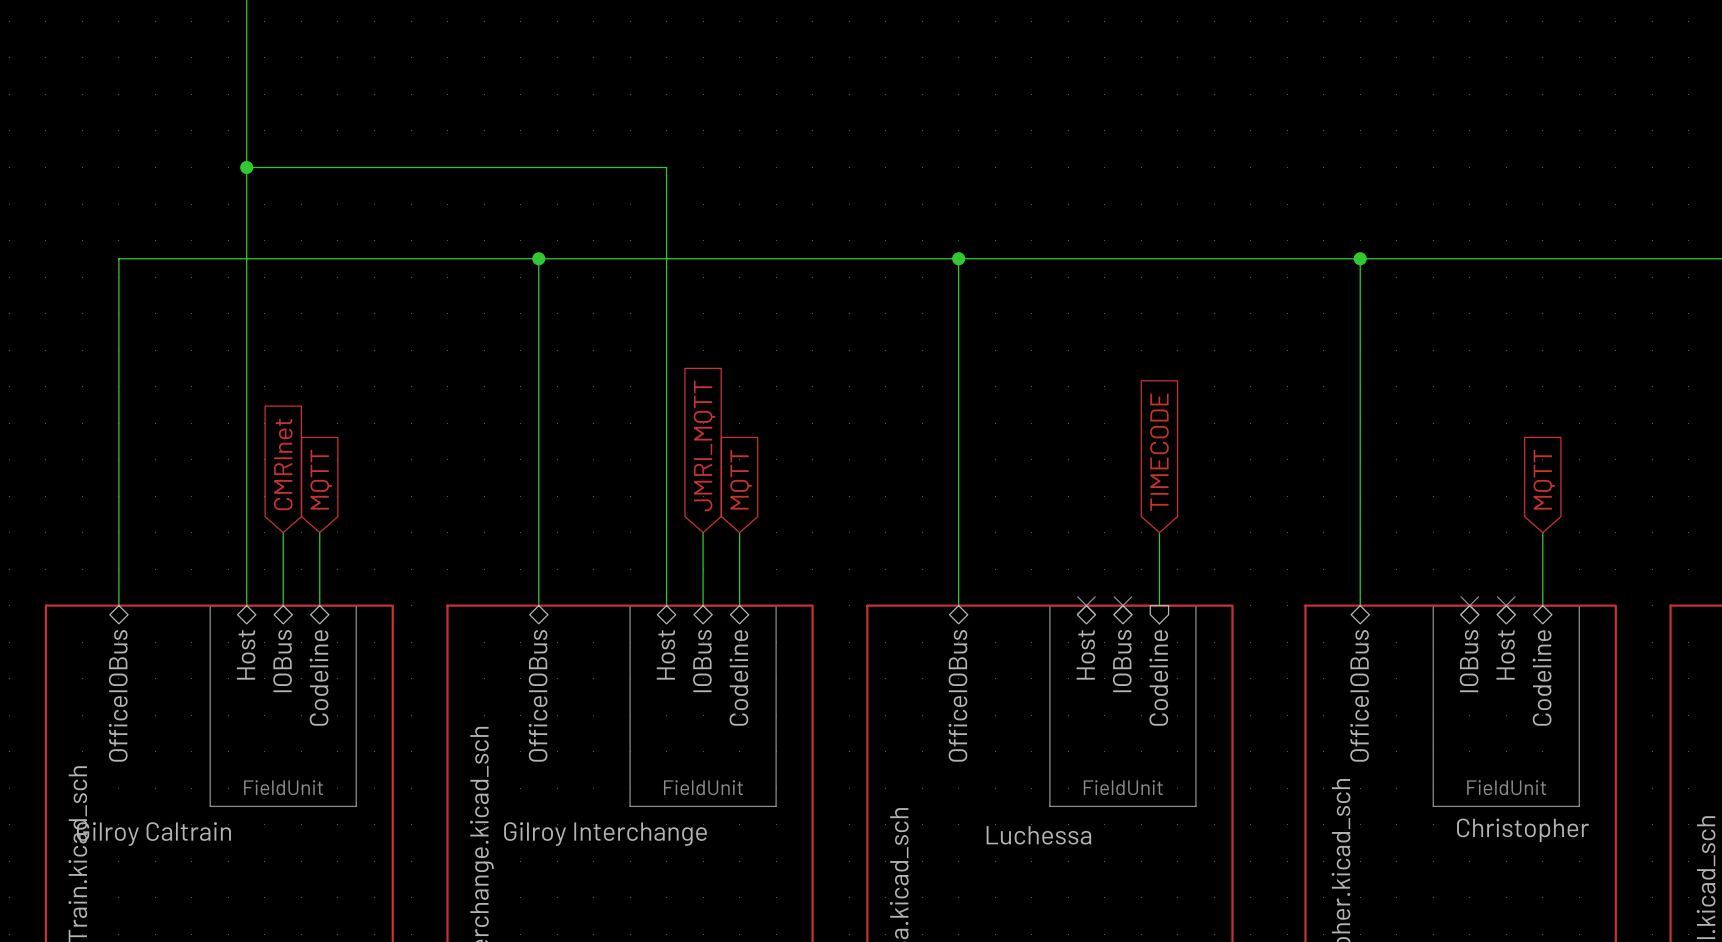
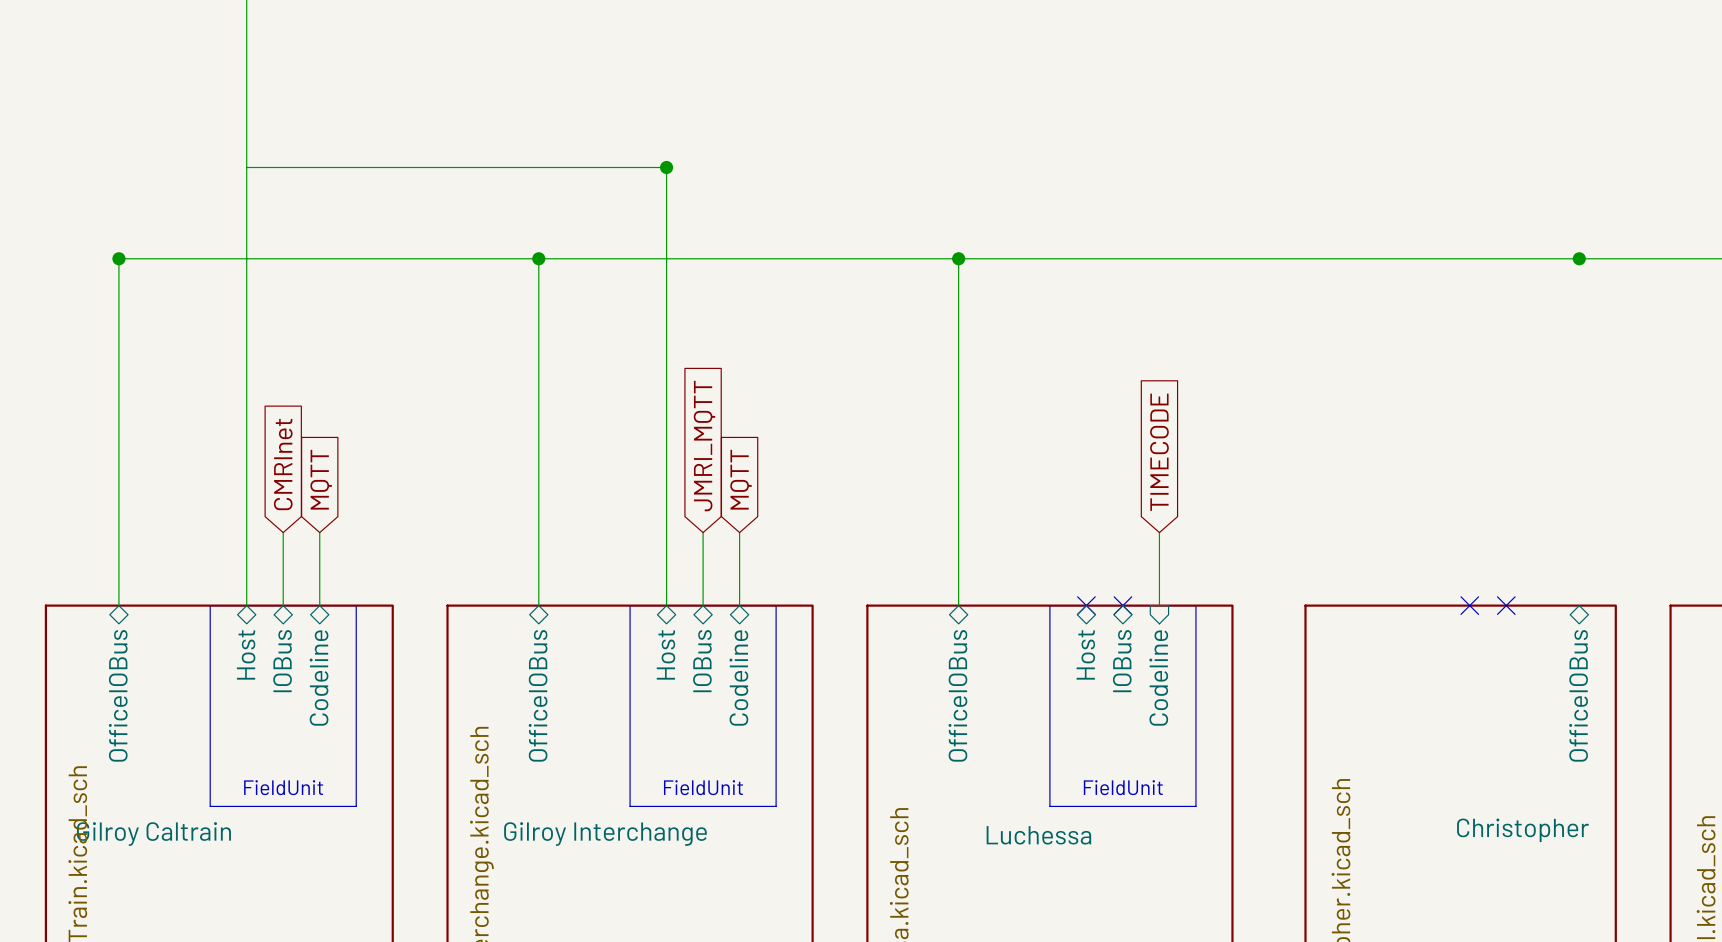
junction: (246, 167) -> none
junction: none -> (666, 167)
junction: none -> (118, 258)
wire: (1360, 258) (1360, 605) -> none
junction: (1360, 258) -> none
junction: none -> (1579, 258)
global label: MQTT (1544, 479) -> none
wire: (1542, 532) (1542, 605) -> none
line: (1433, 605) (1579, 605) (1579, 806) (1433, 806) (1433, 605) -> none
sheet pin: Host (1505, 654) -> none
sheet pin: IOBus (1469, 661) -> none
sheet pin: Codeline (1542, 678) -> none
sheet pin: OfficeIOBus (1359, 695) -> none
sheet pin: none -> OfficeIOBus (1578, 695)
text: FieldUnit (1506, 787) -> none

